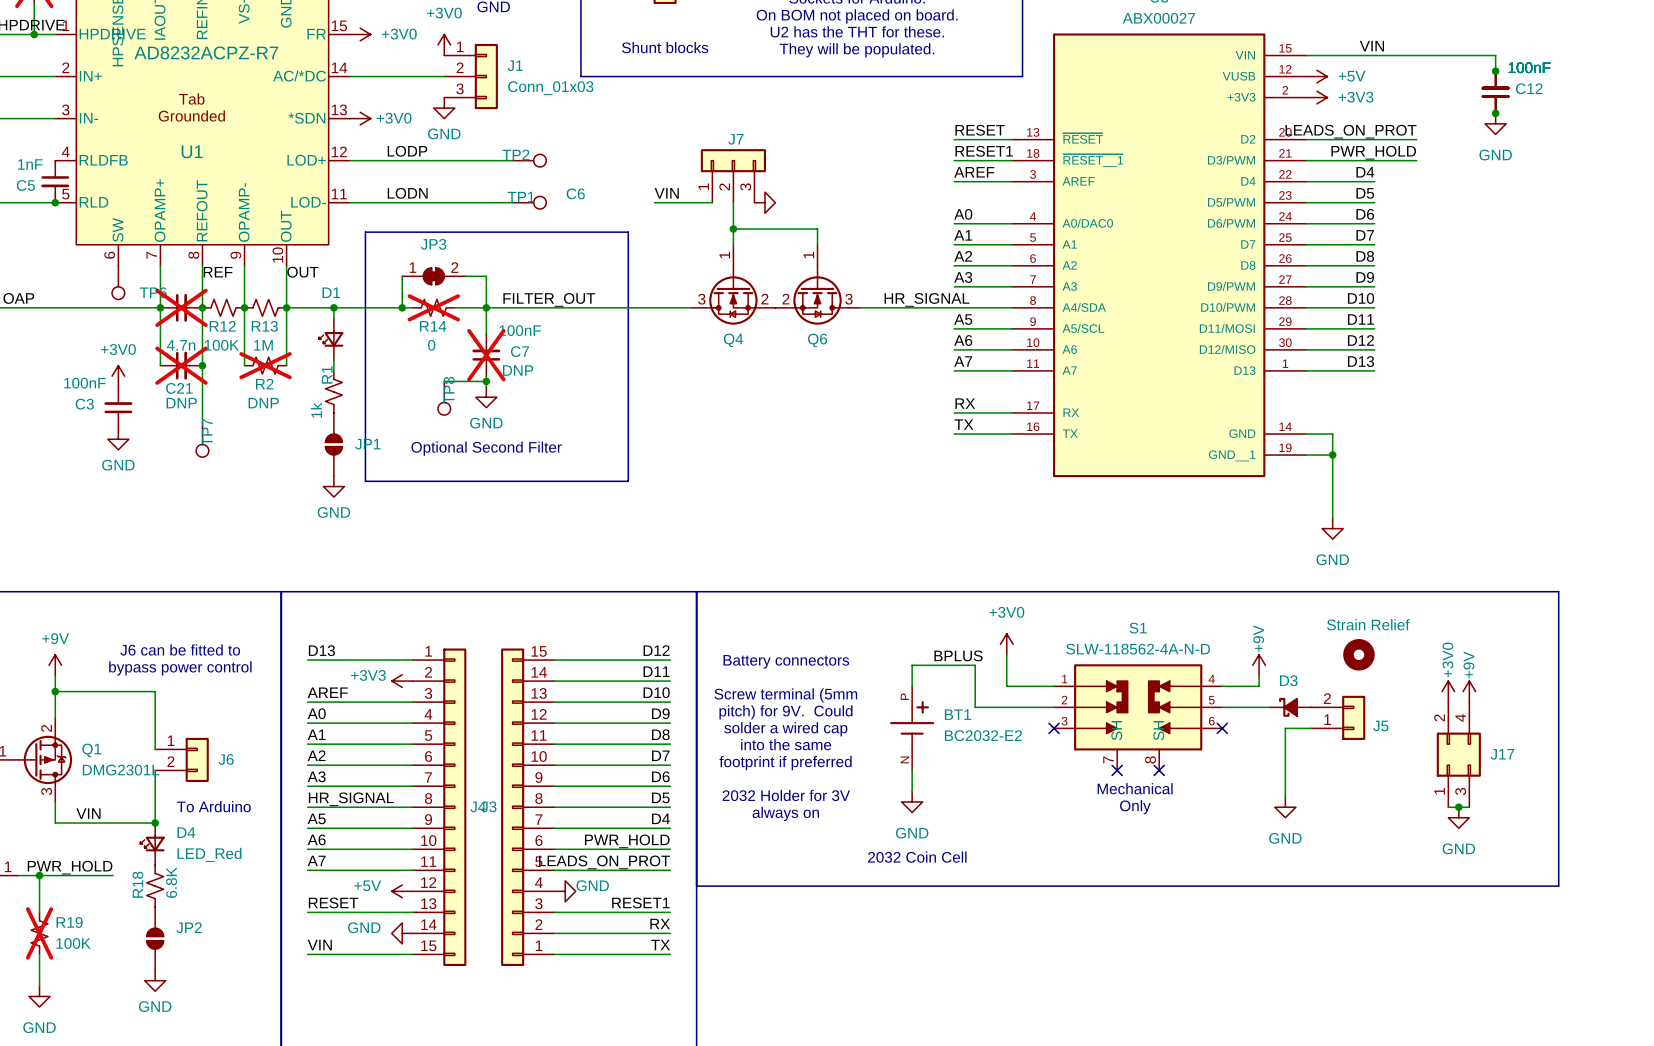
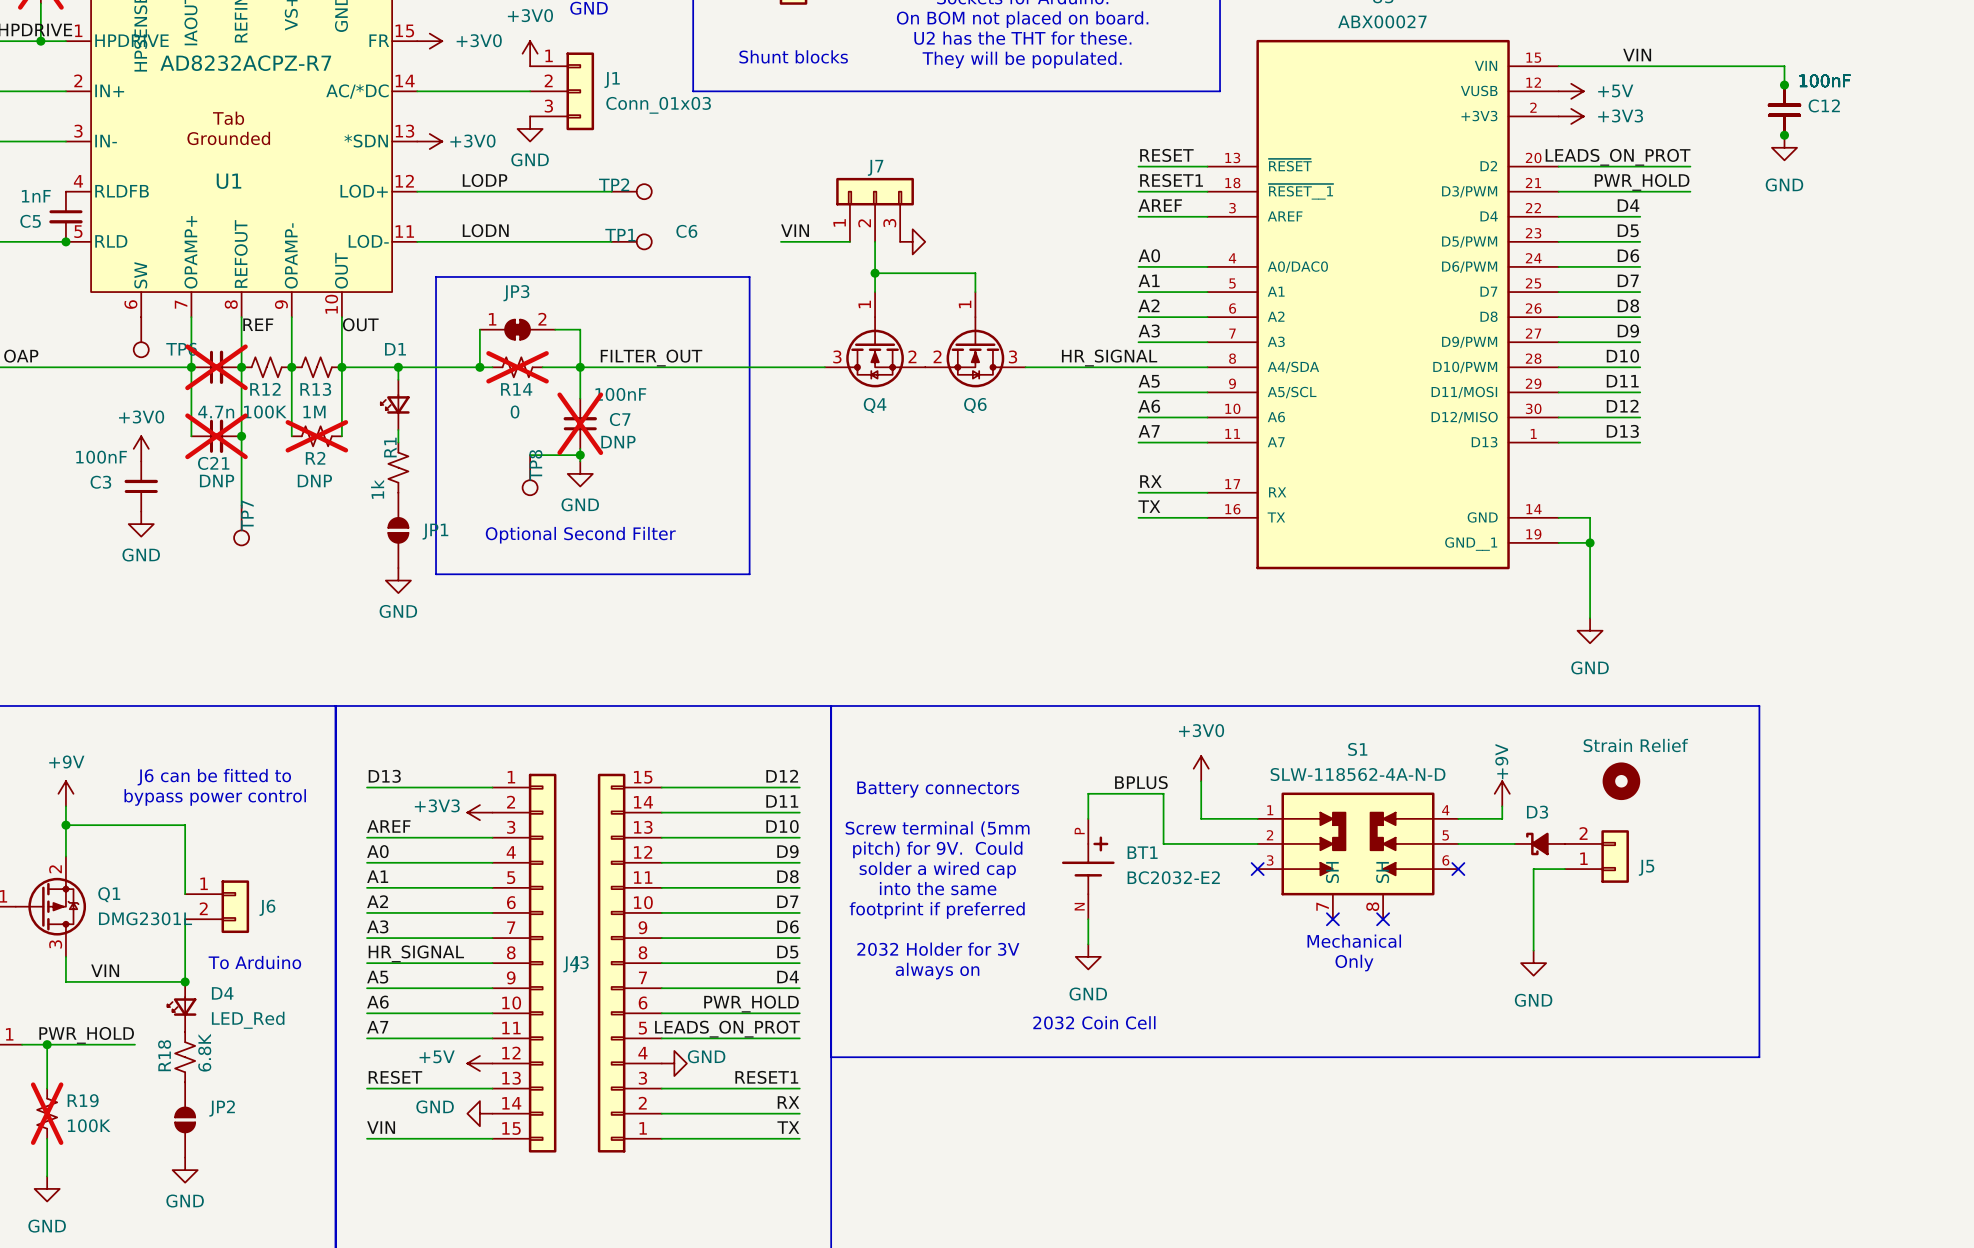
line: (1474, 591) (1558, 591) (1558, 886) (1474, 886) -> (1759, 705) (1759, 1057)
power symbol: +3V0 (1448, 691) -> none
power symbol: +9V (1469, 691) -> none
J17: (1458, 754) -> none
wire: (1448, 807) (1469, 807) -> none
junction: (1458, 807) -> none
power symbol: GND (1458, 817) -> none

